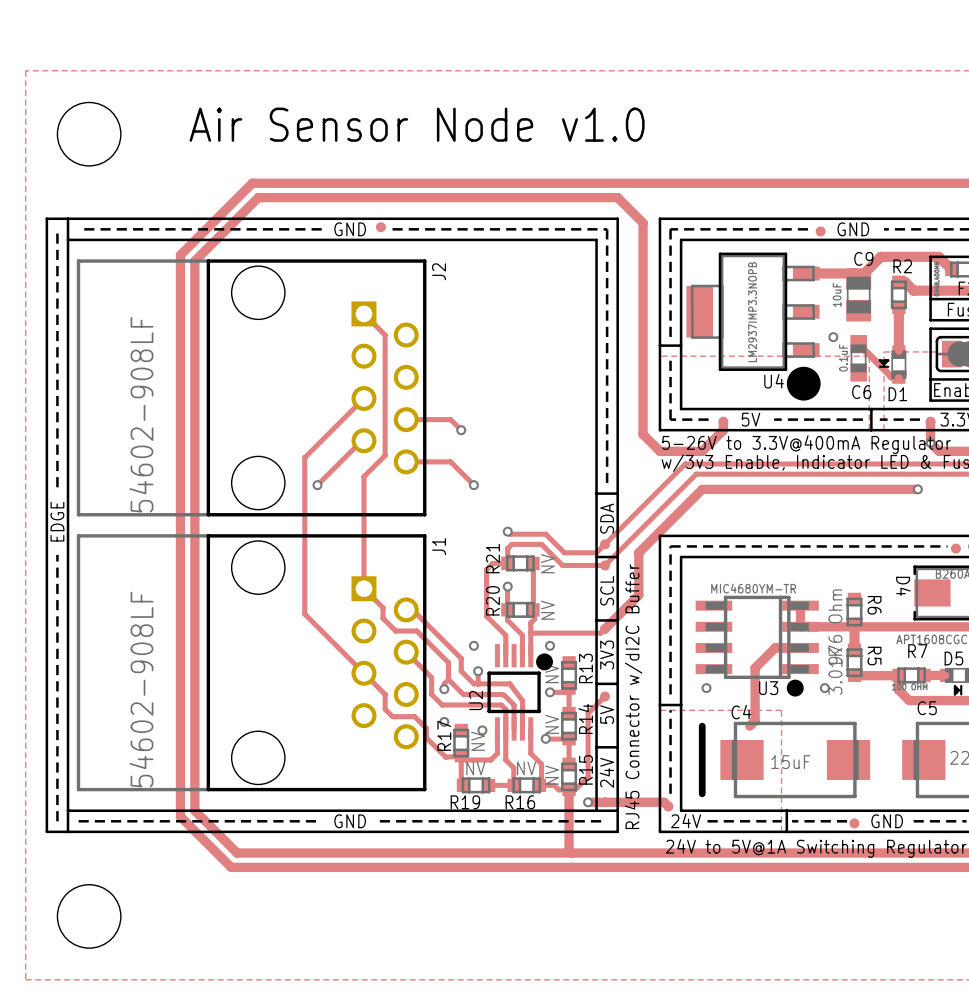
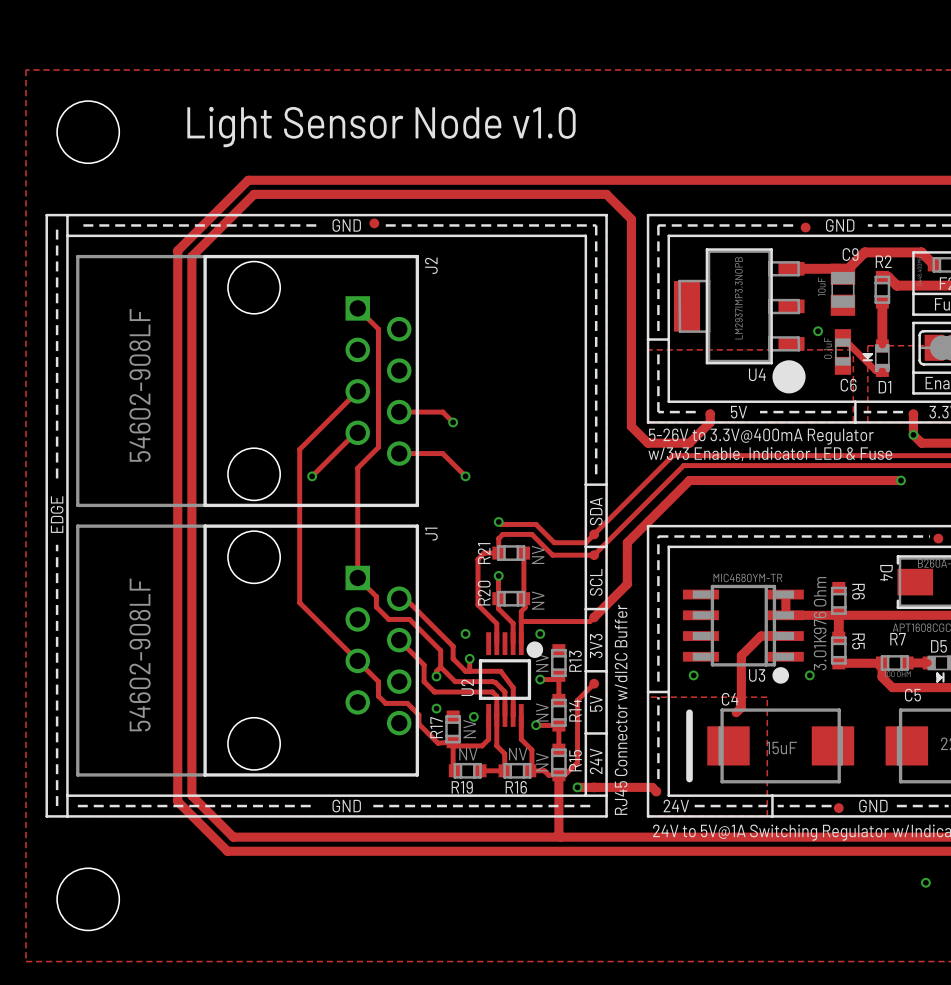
text: Air Sensor Node v1.0 (417, 124) -> Light Sensor Node v1.0 (381, 127)
via: none -> (925, 882)

